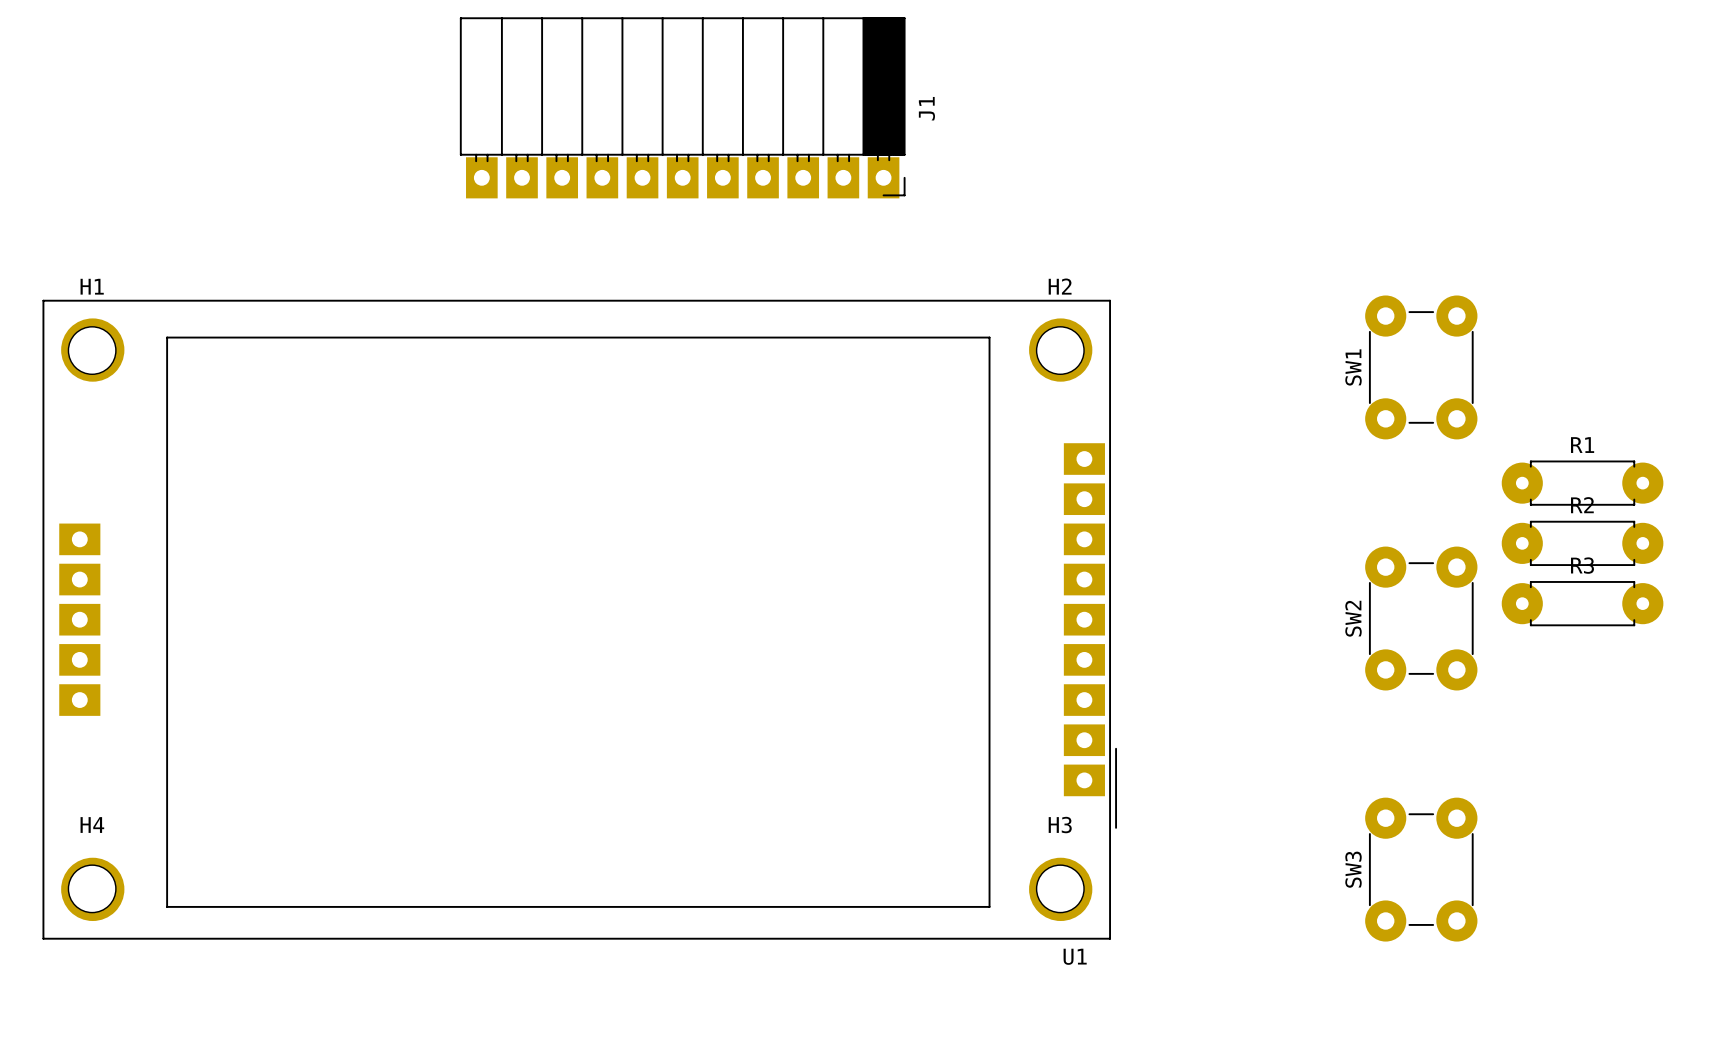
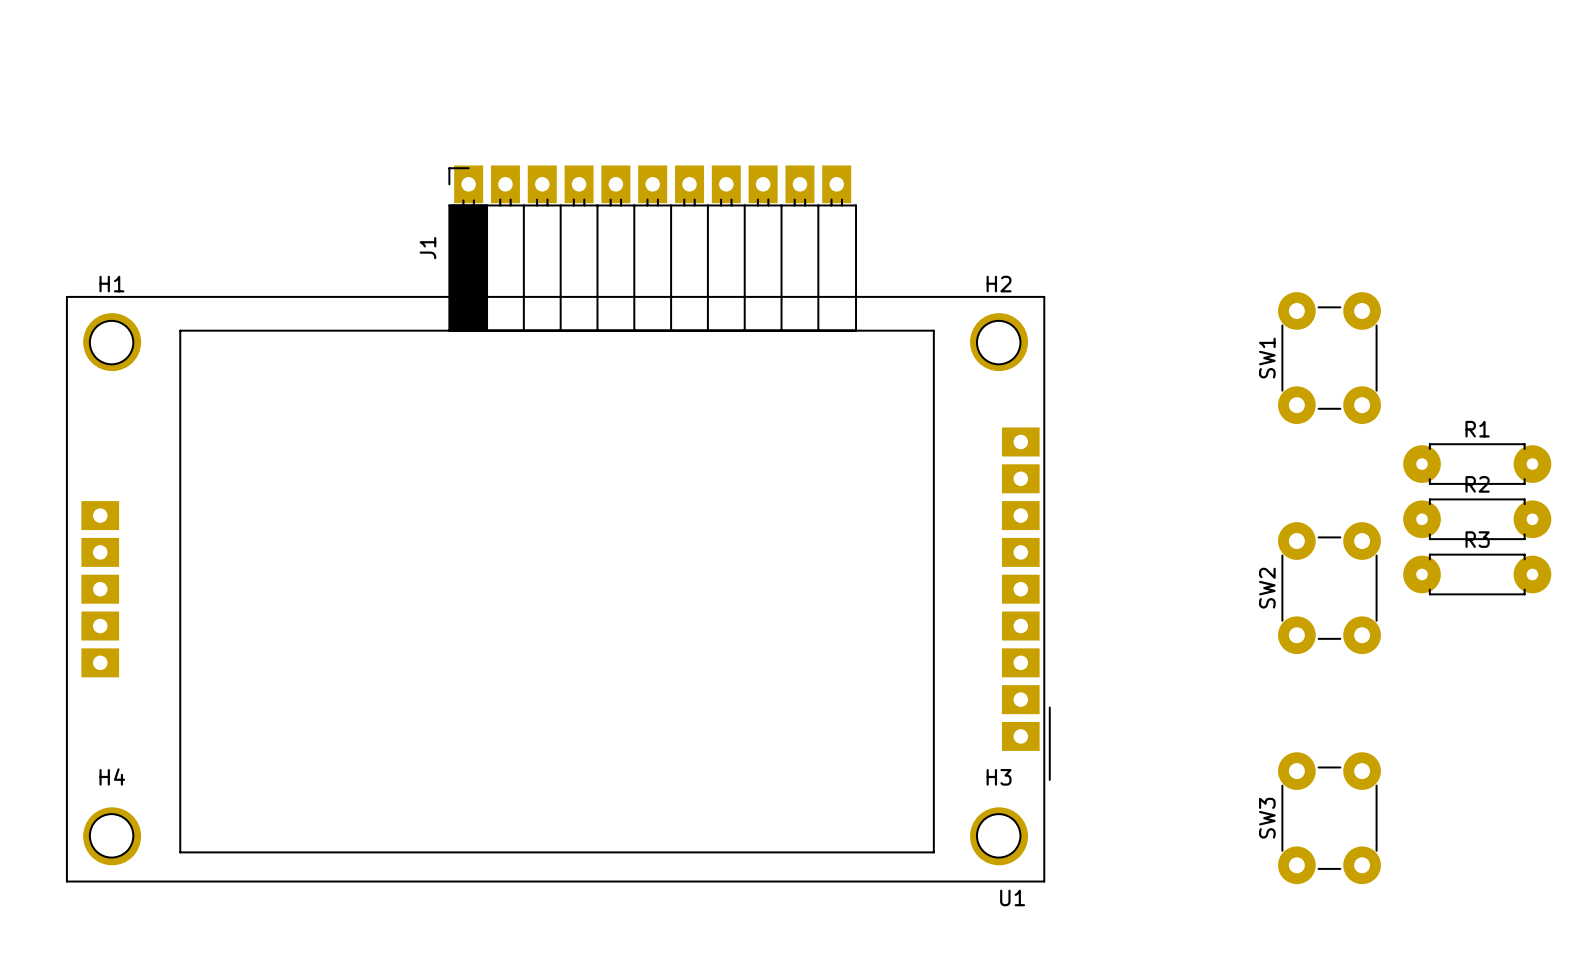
J1 rotation: 0° (682, 107) -> 180° (652, 248)

